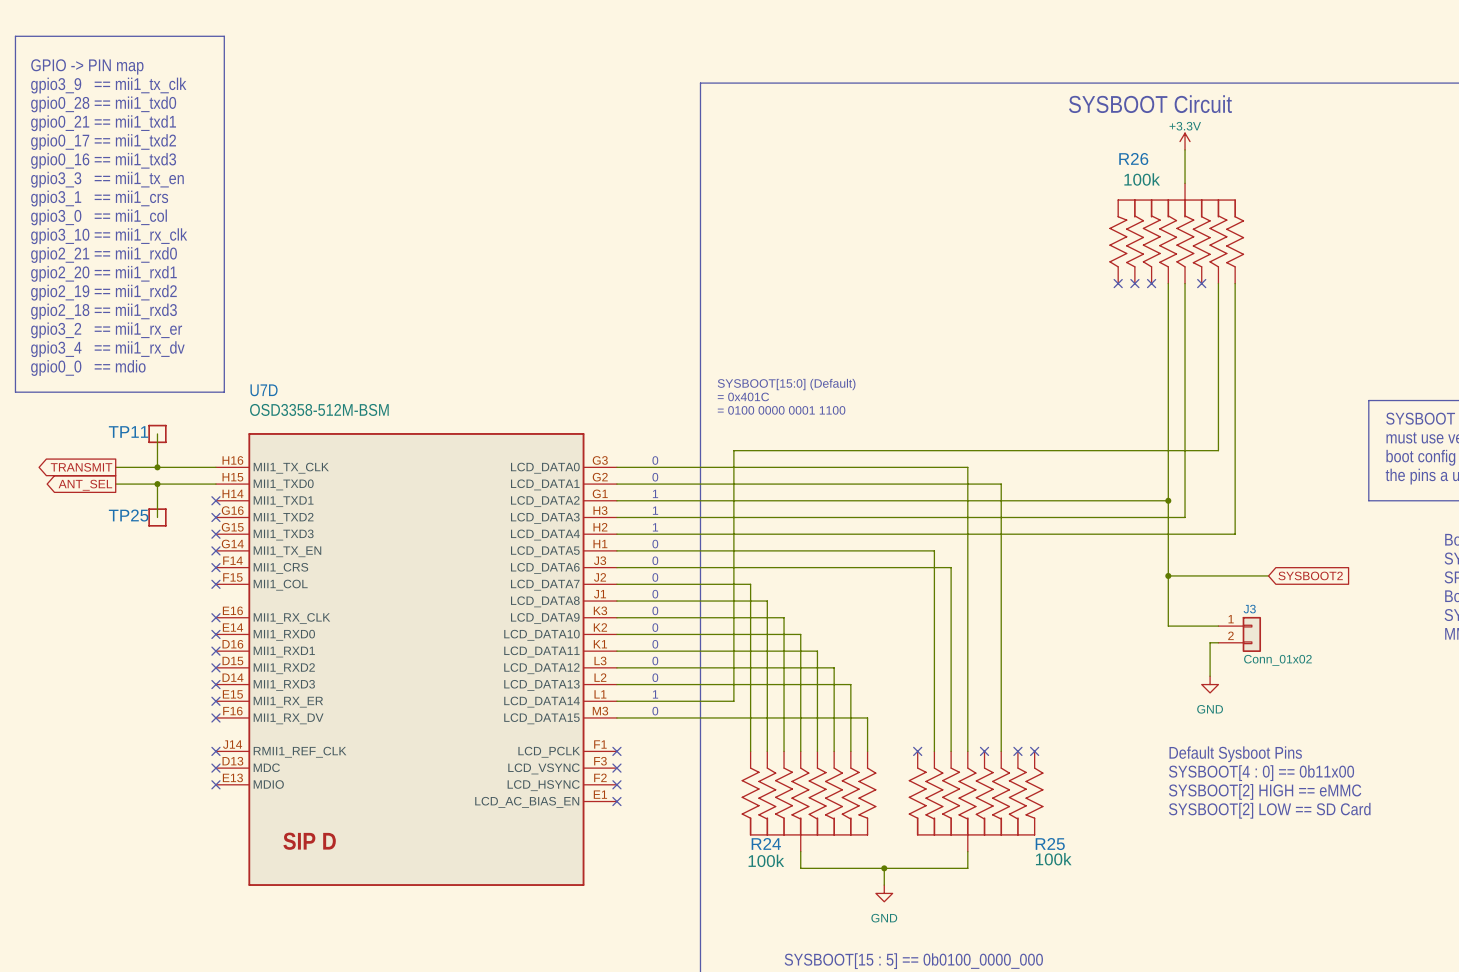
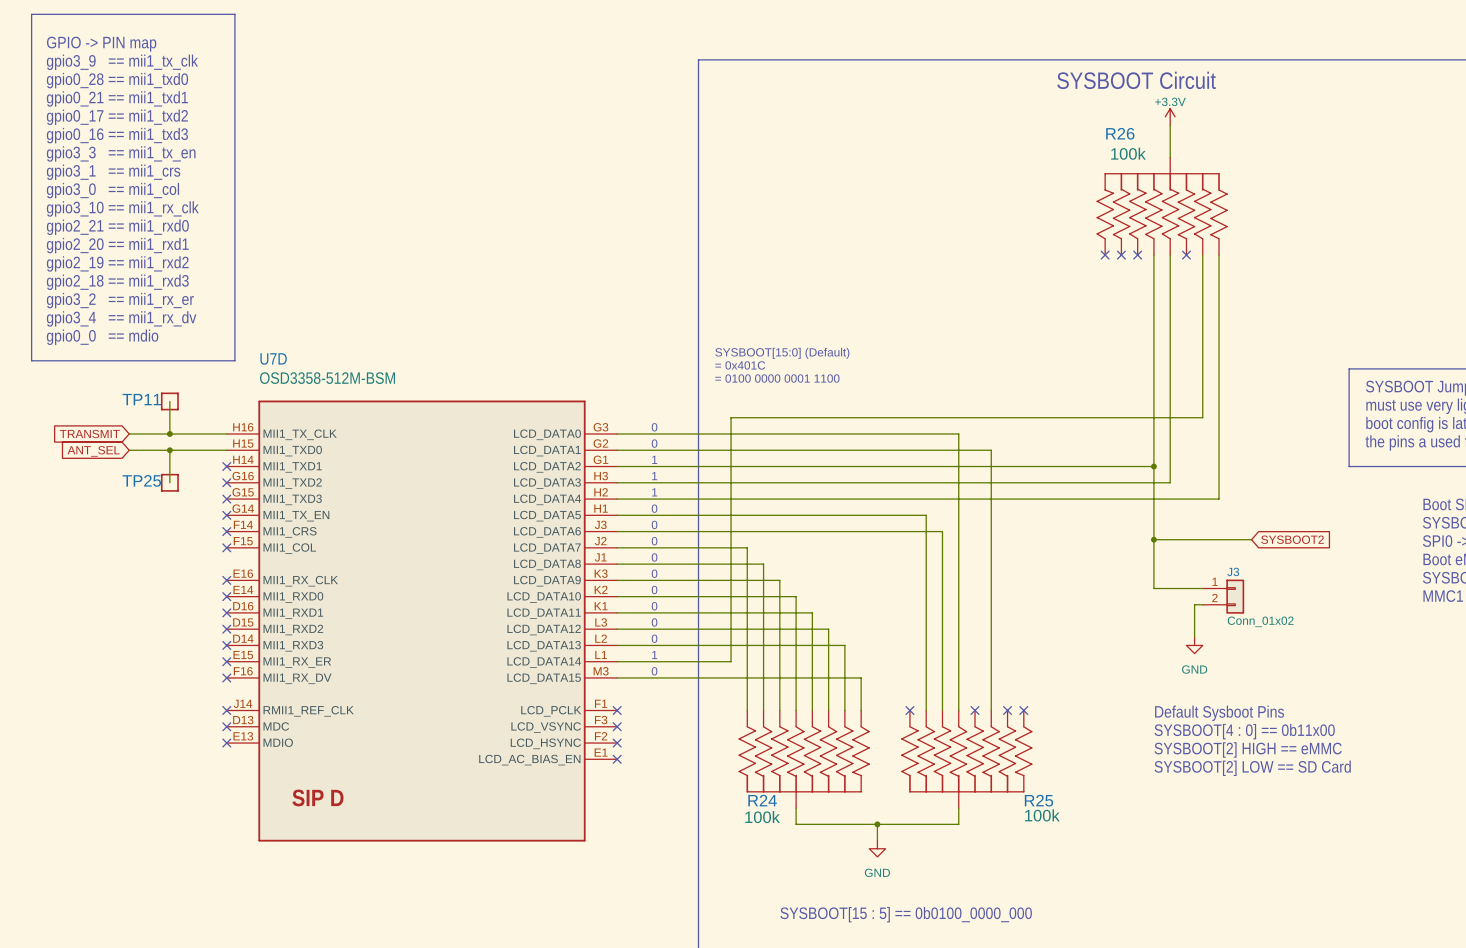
global label shape: output (81, 467) -> input (89, 433)
global label shape: output (85, 485) -> input (93, 451)

